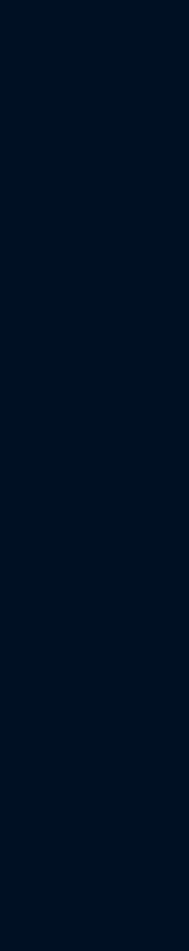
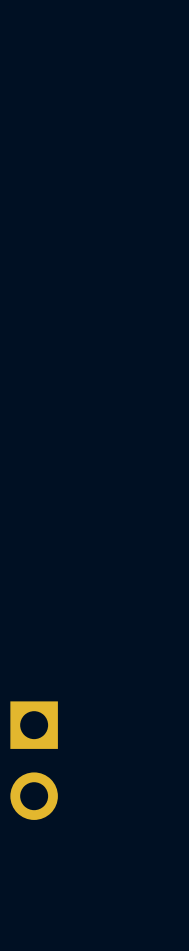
part: none -> (34, 760)

